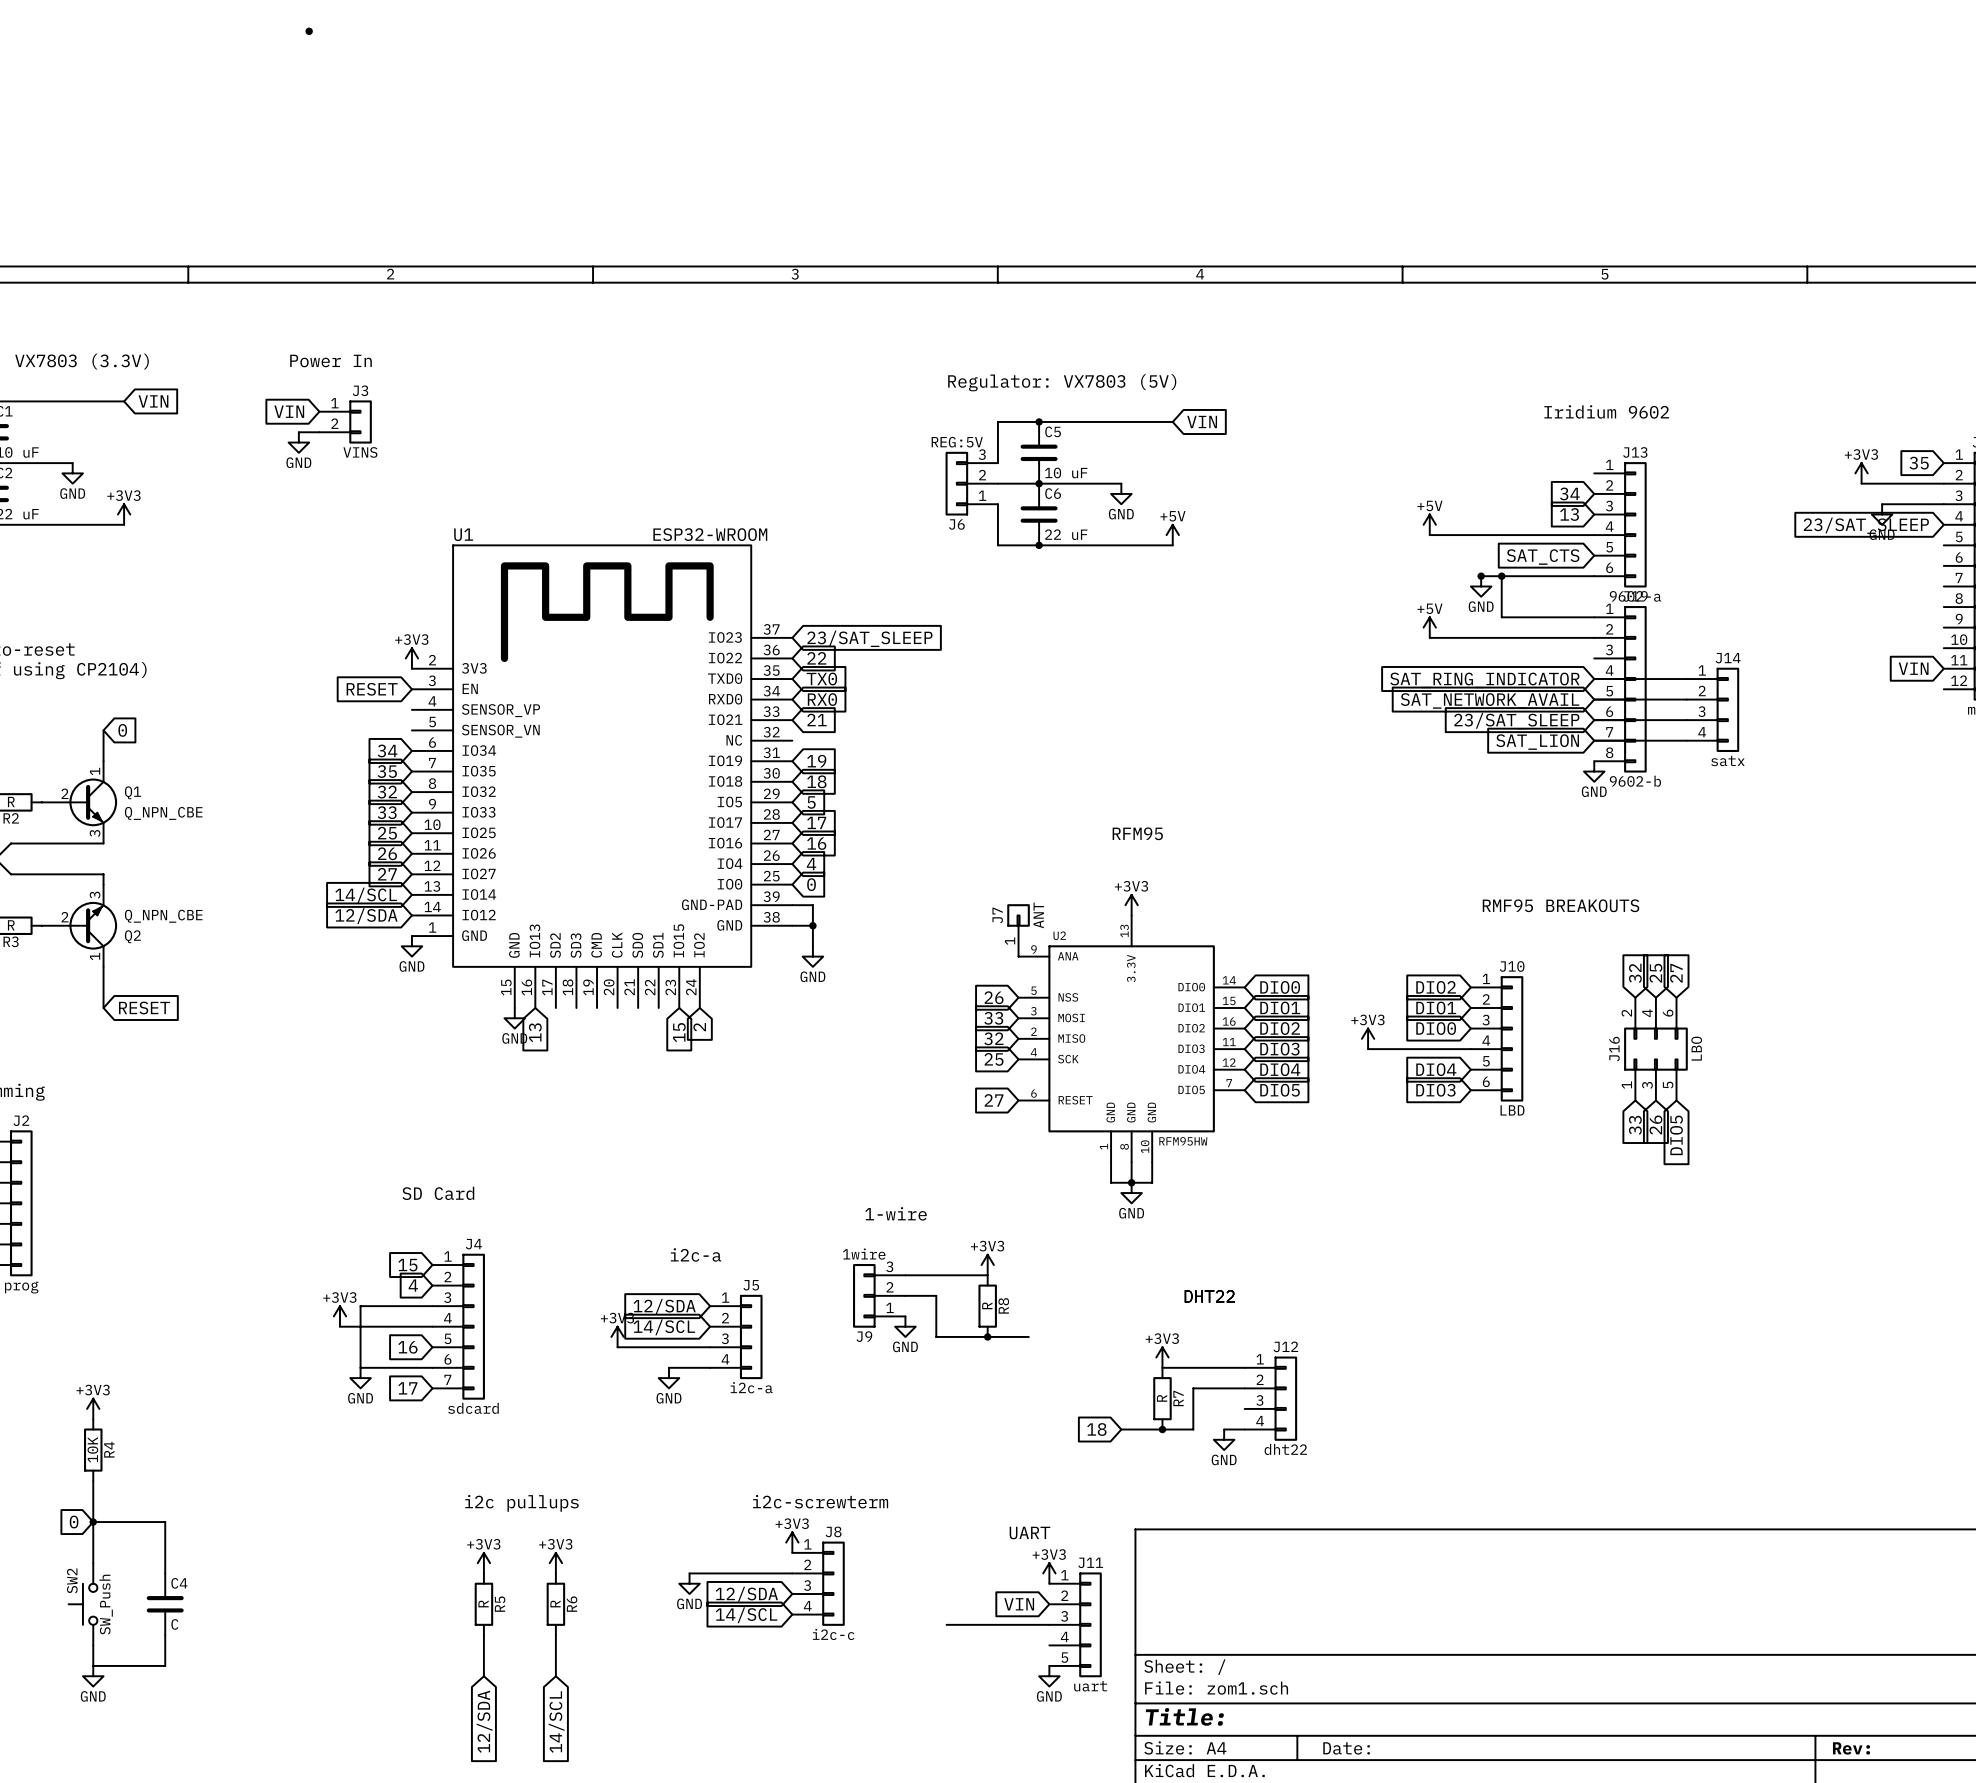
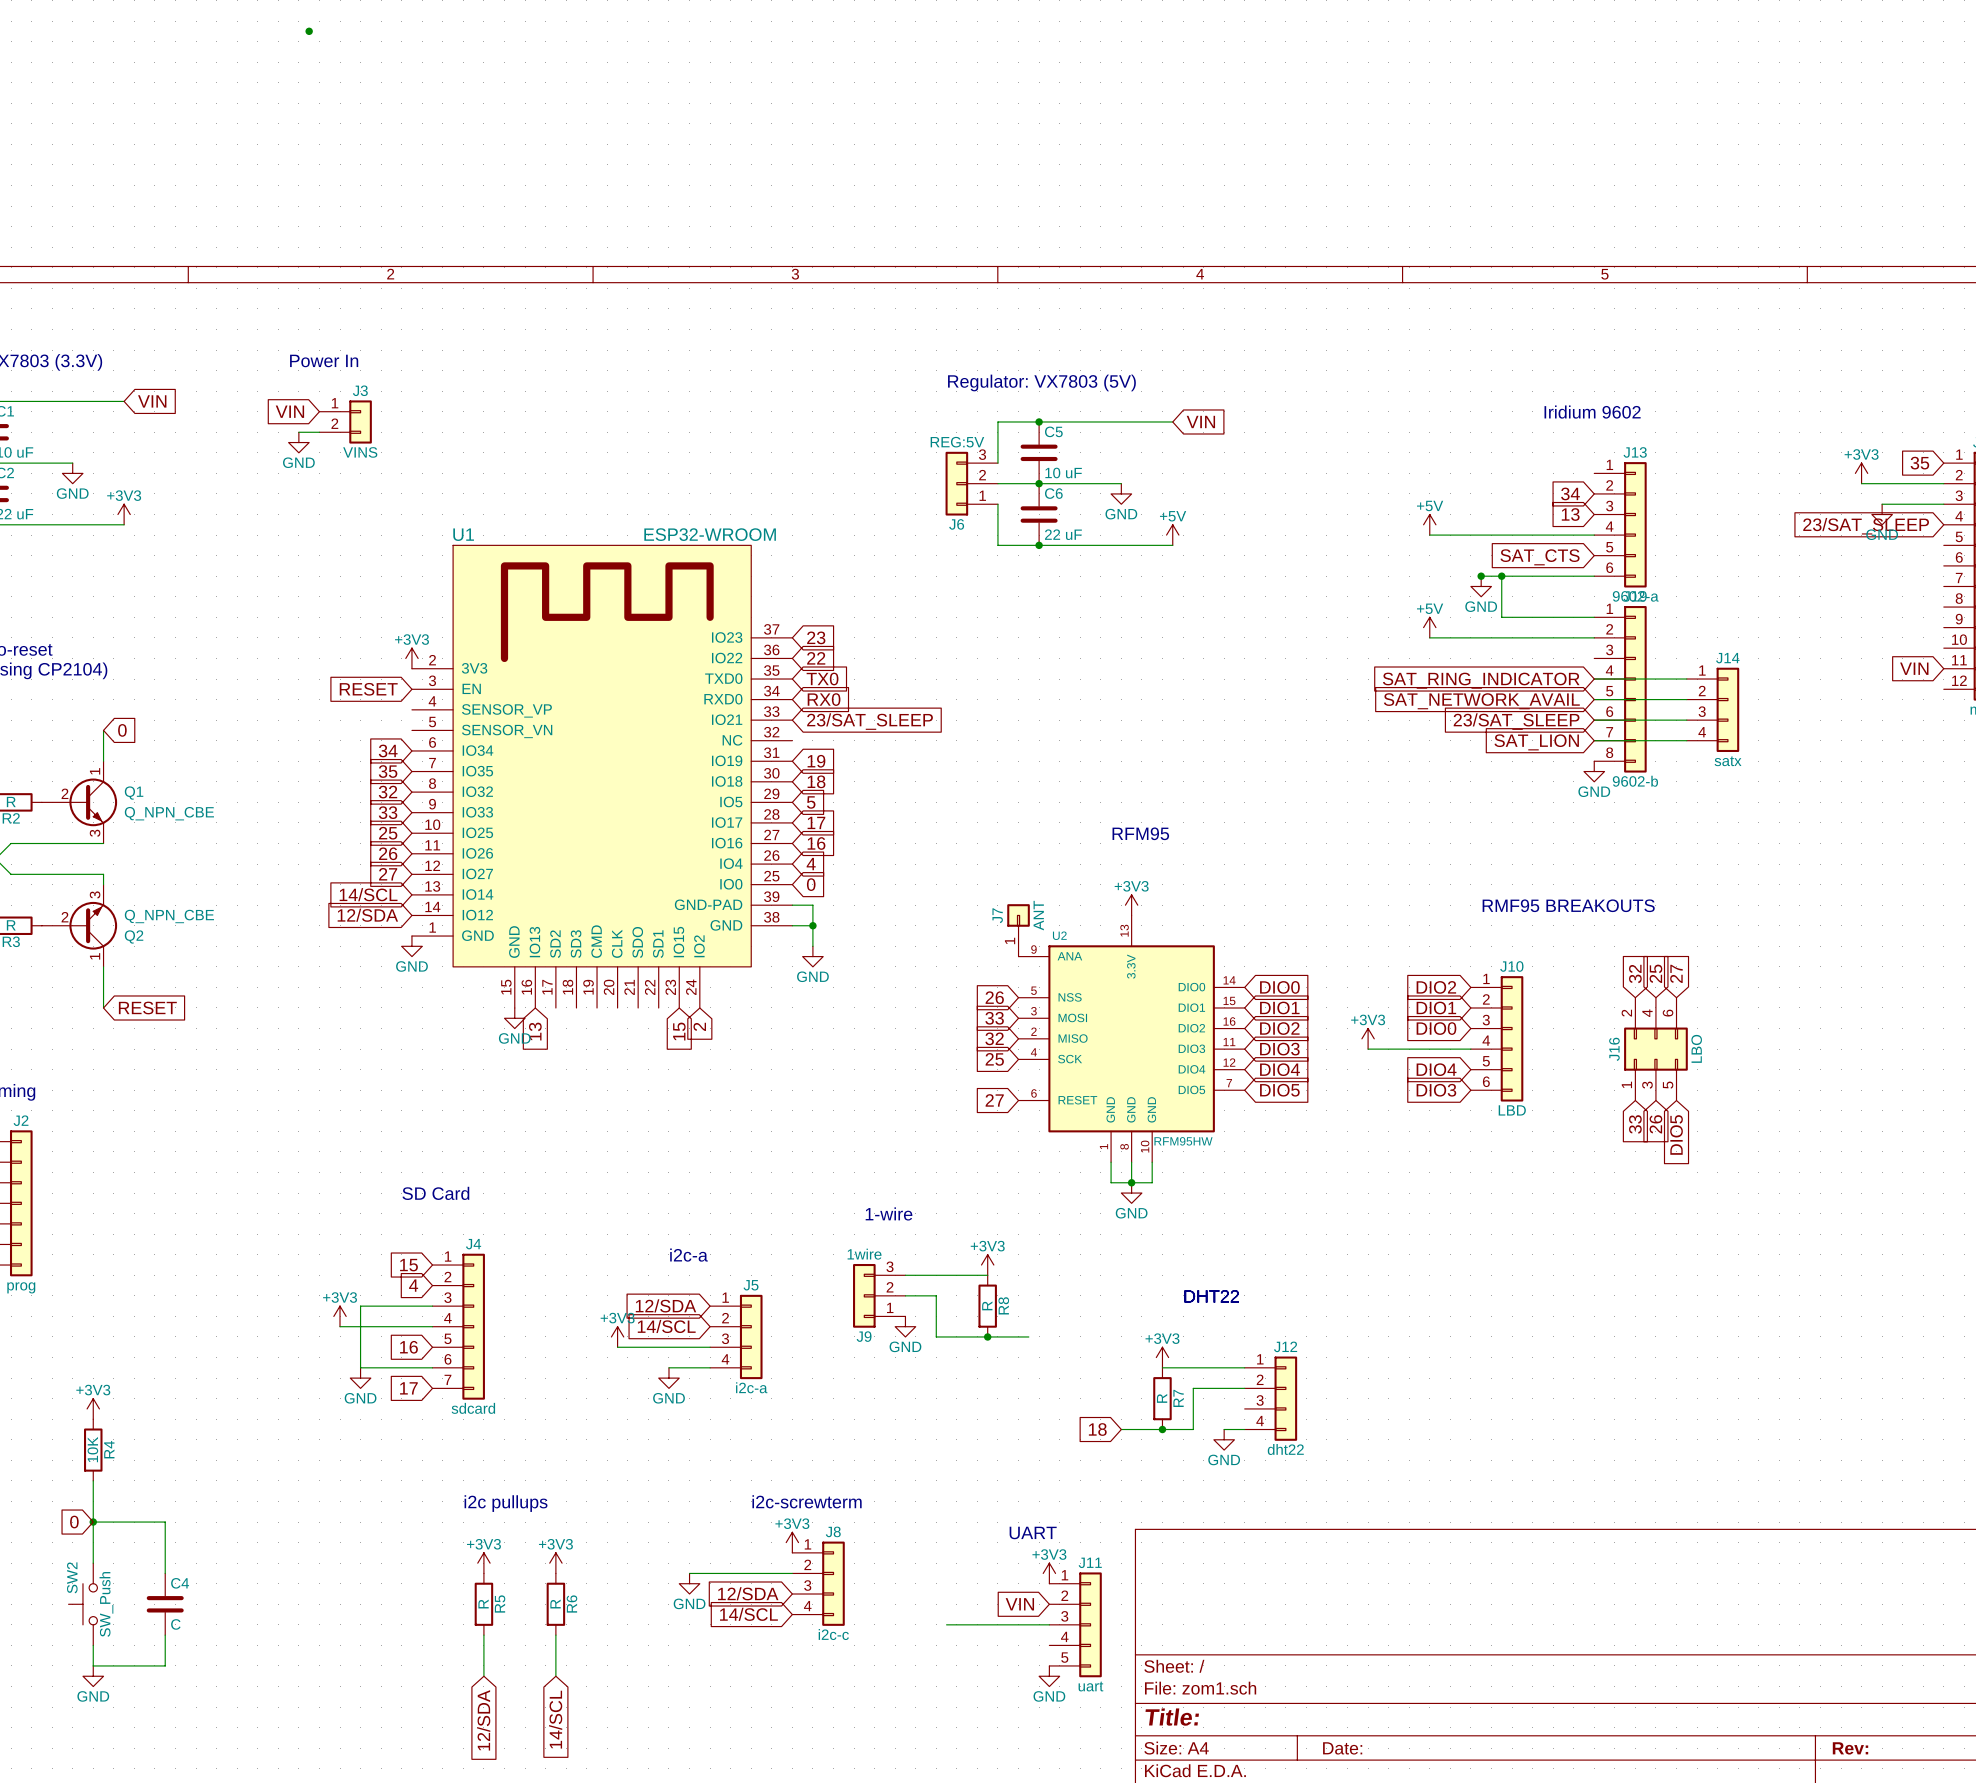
global label: 23/SAT_SLEEP (869, 638) -> 23 (816, 637)
global label: 21 (817, 720) -> 23/SAT_SLEEP (870, 721)

